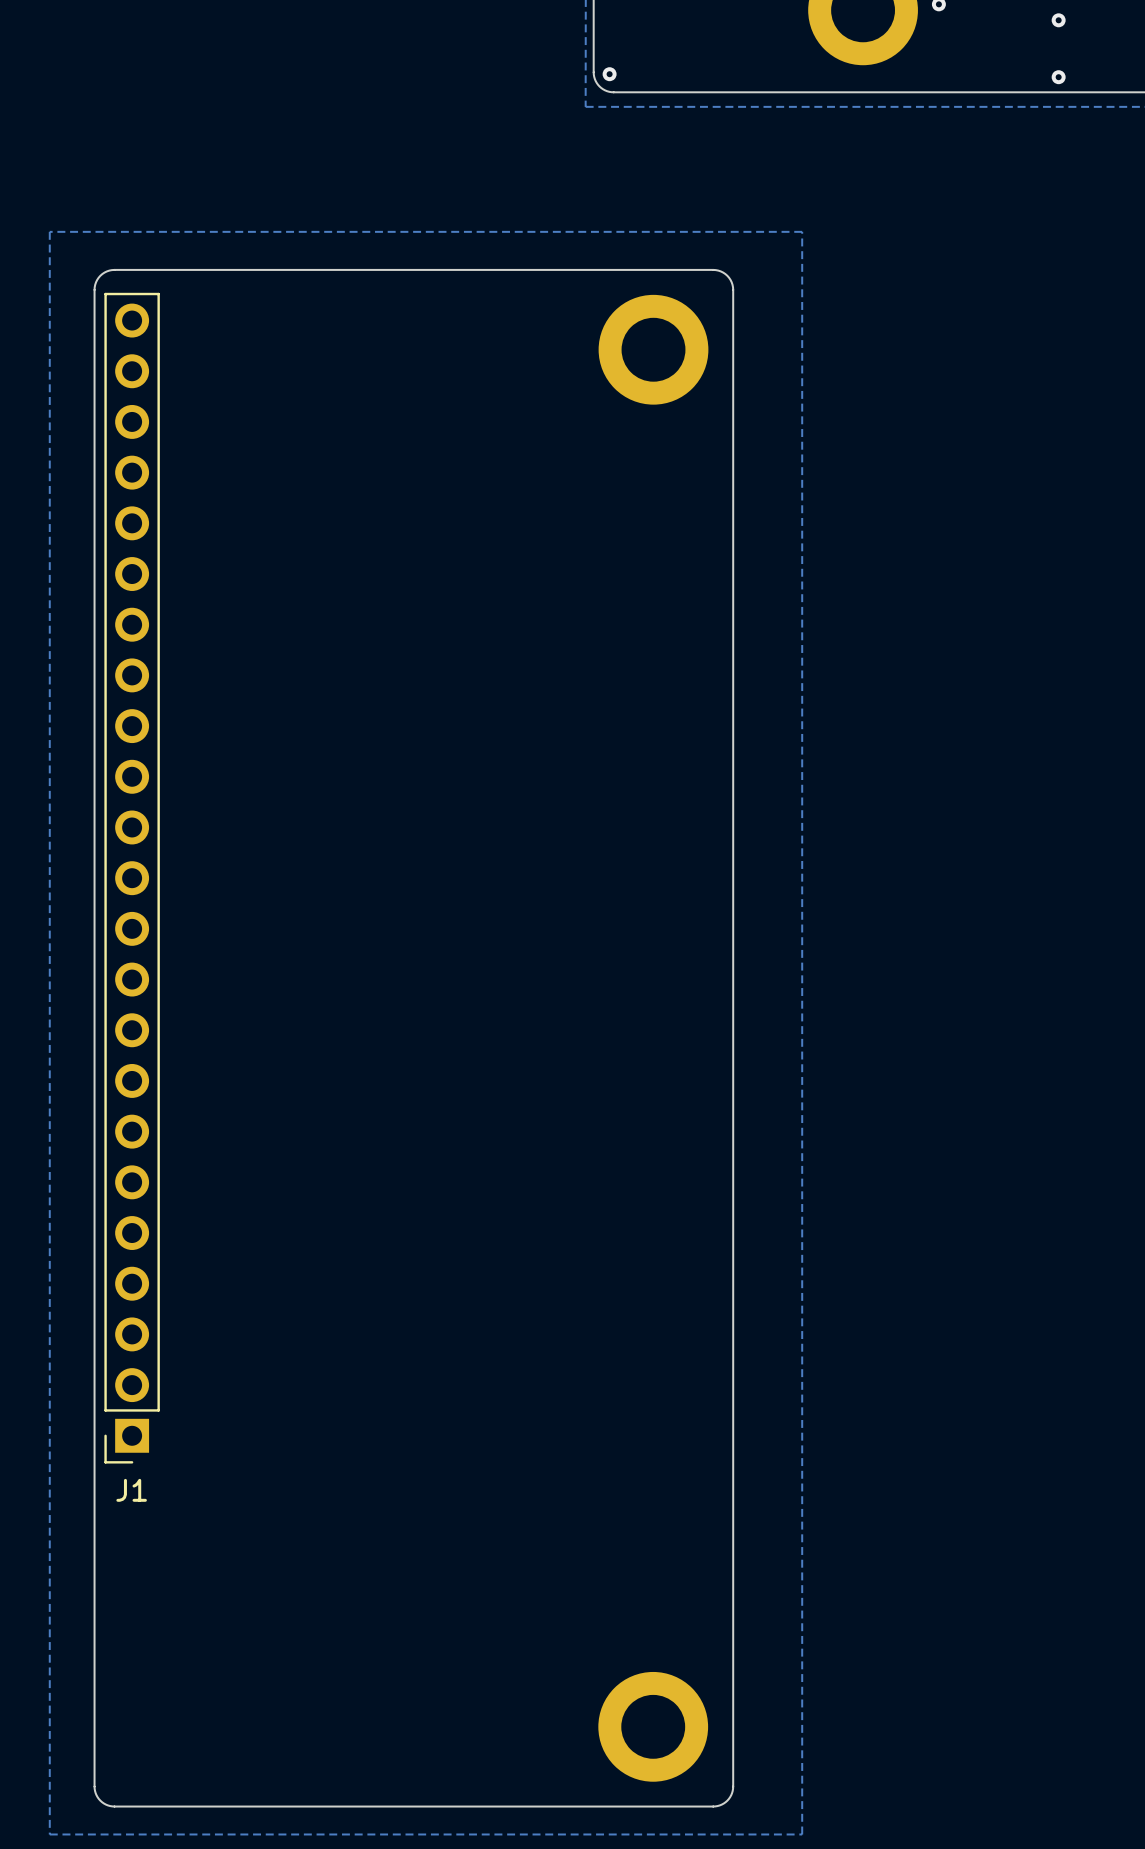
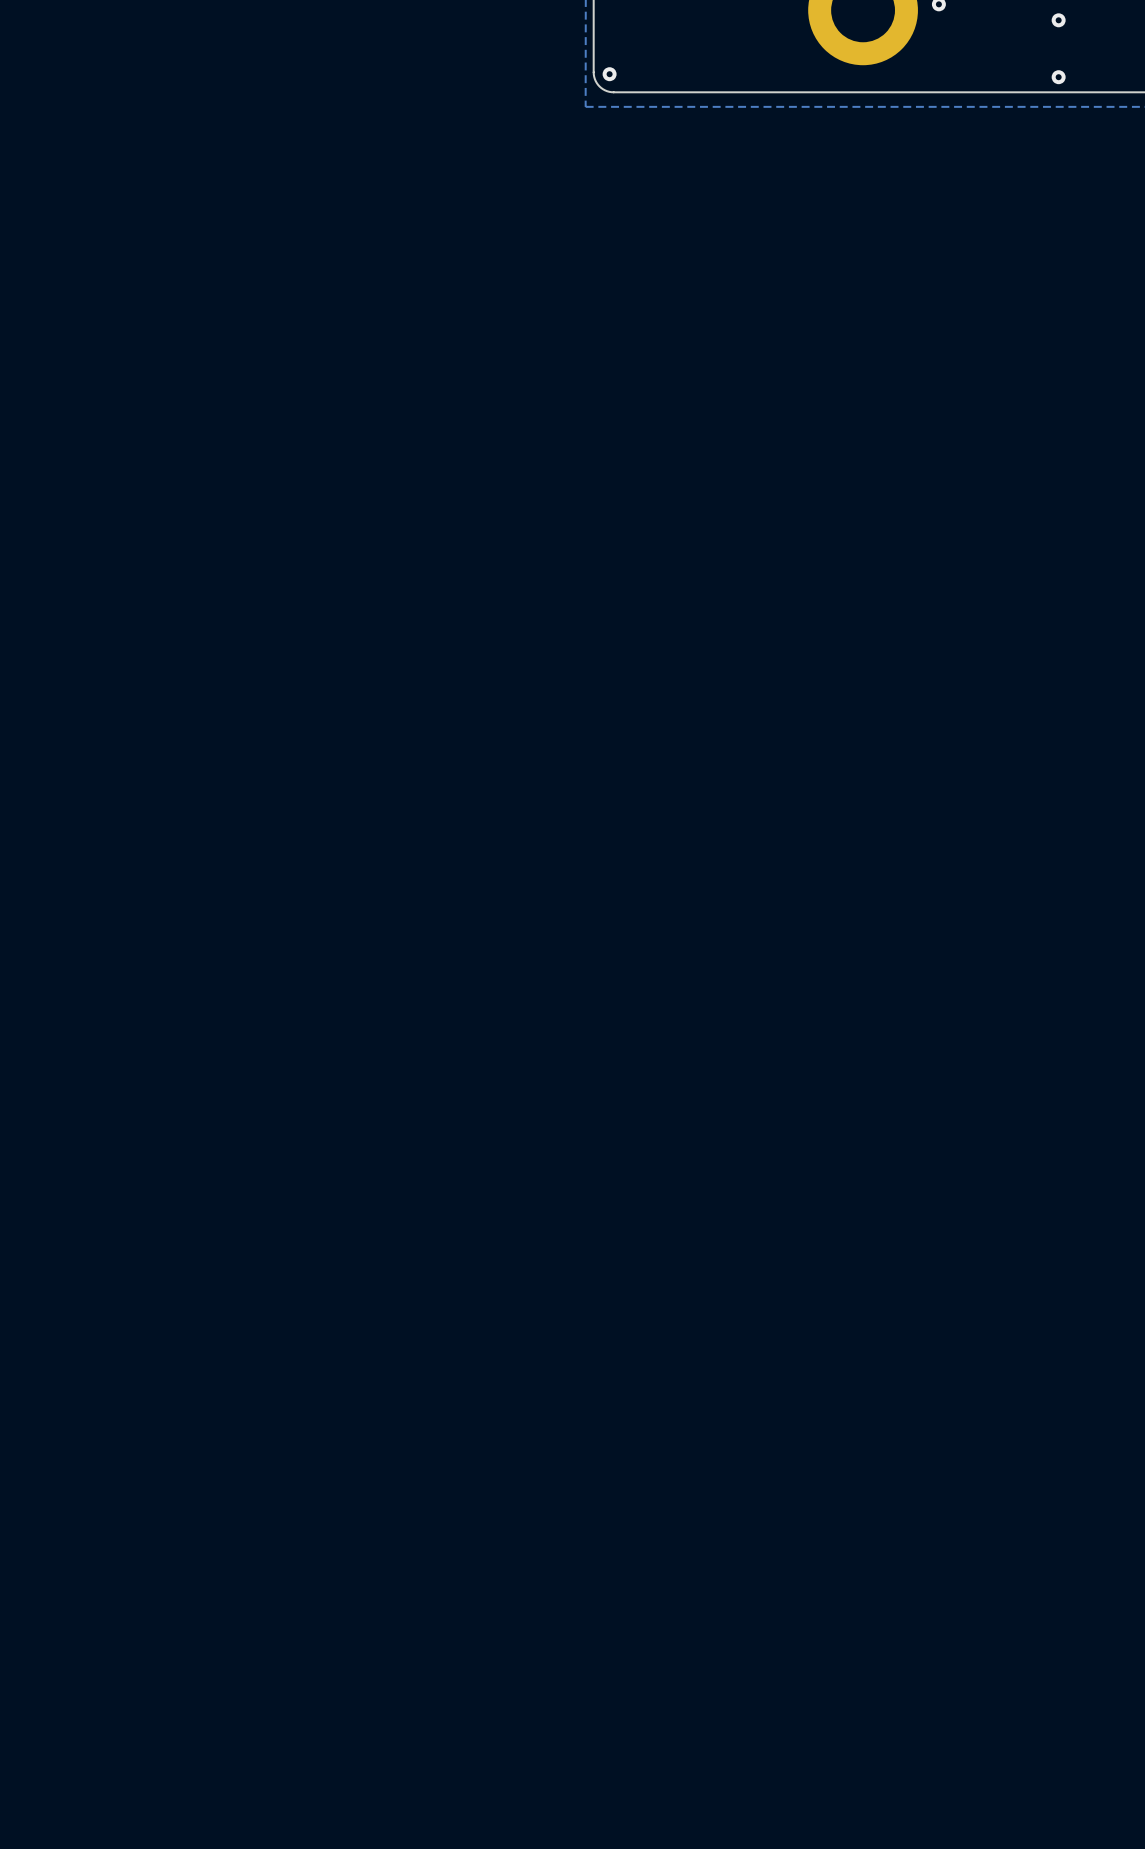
zone outline: (802, 231) (802, 1834) (49, 1834) (49, 231) (802, 231) -> none
board edge: (713, 269) (114, 269) (104, 272) (96, 282) (94, 289) (94, 1786) (98, 1799) (107, 1805) (713, 1806) (725, 1802) (732, 1793) (733, 289) (731, 282) (727, 275) (720, 271) (713, 269) -> none
part: (653, 349) -> none
J1: (132, 878) -> none
part: (653, 1726) -> none

